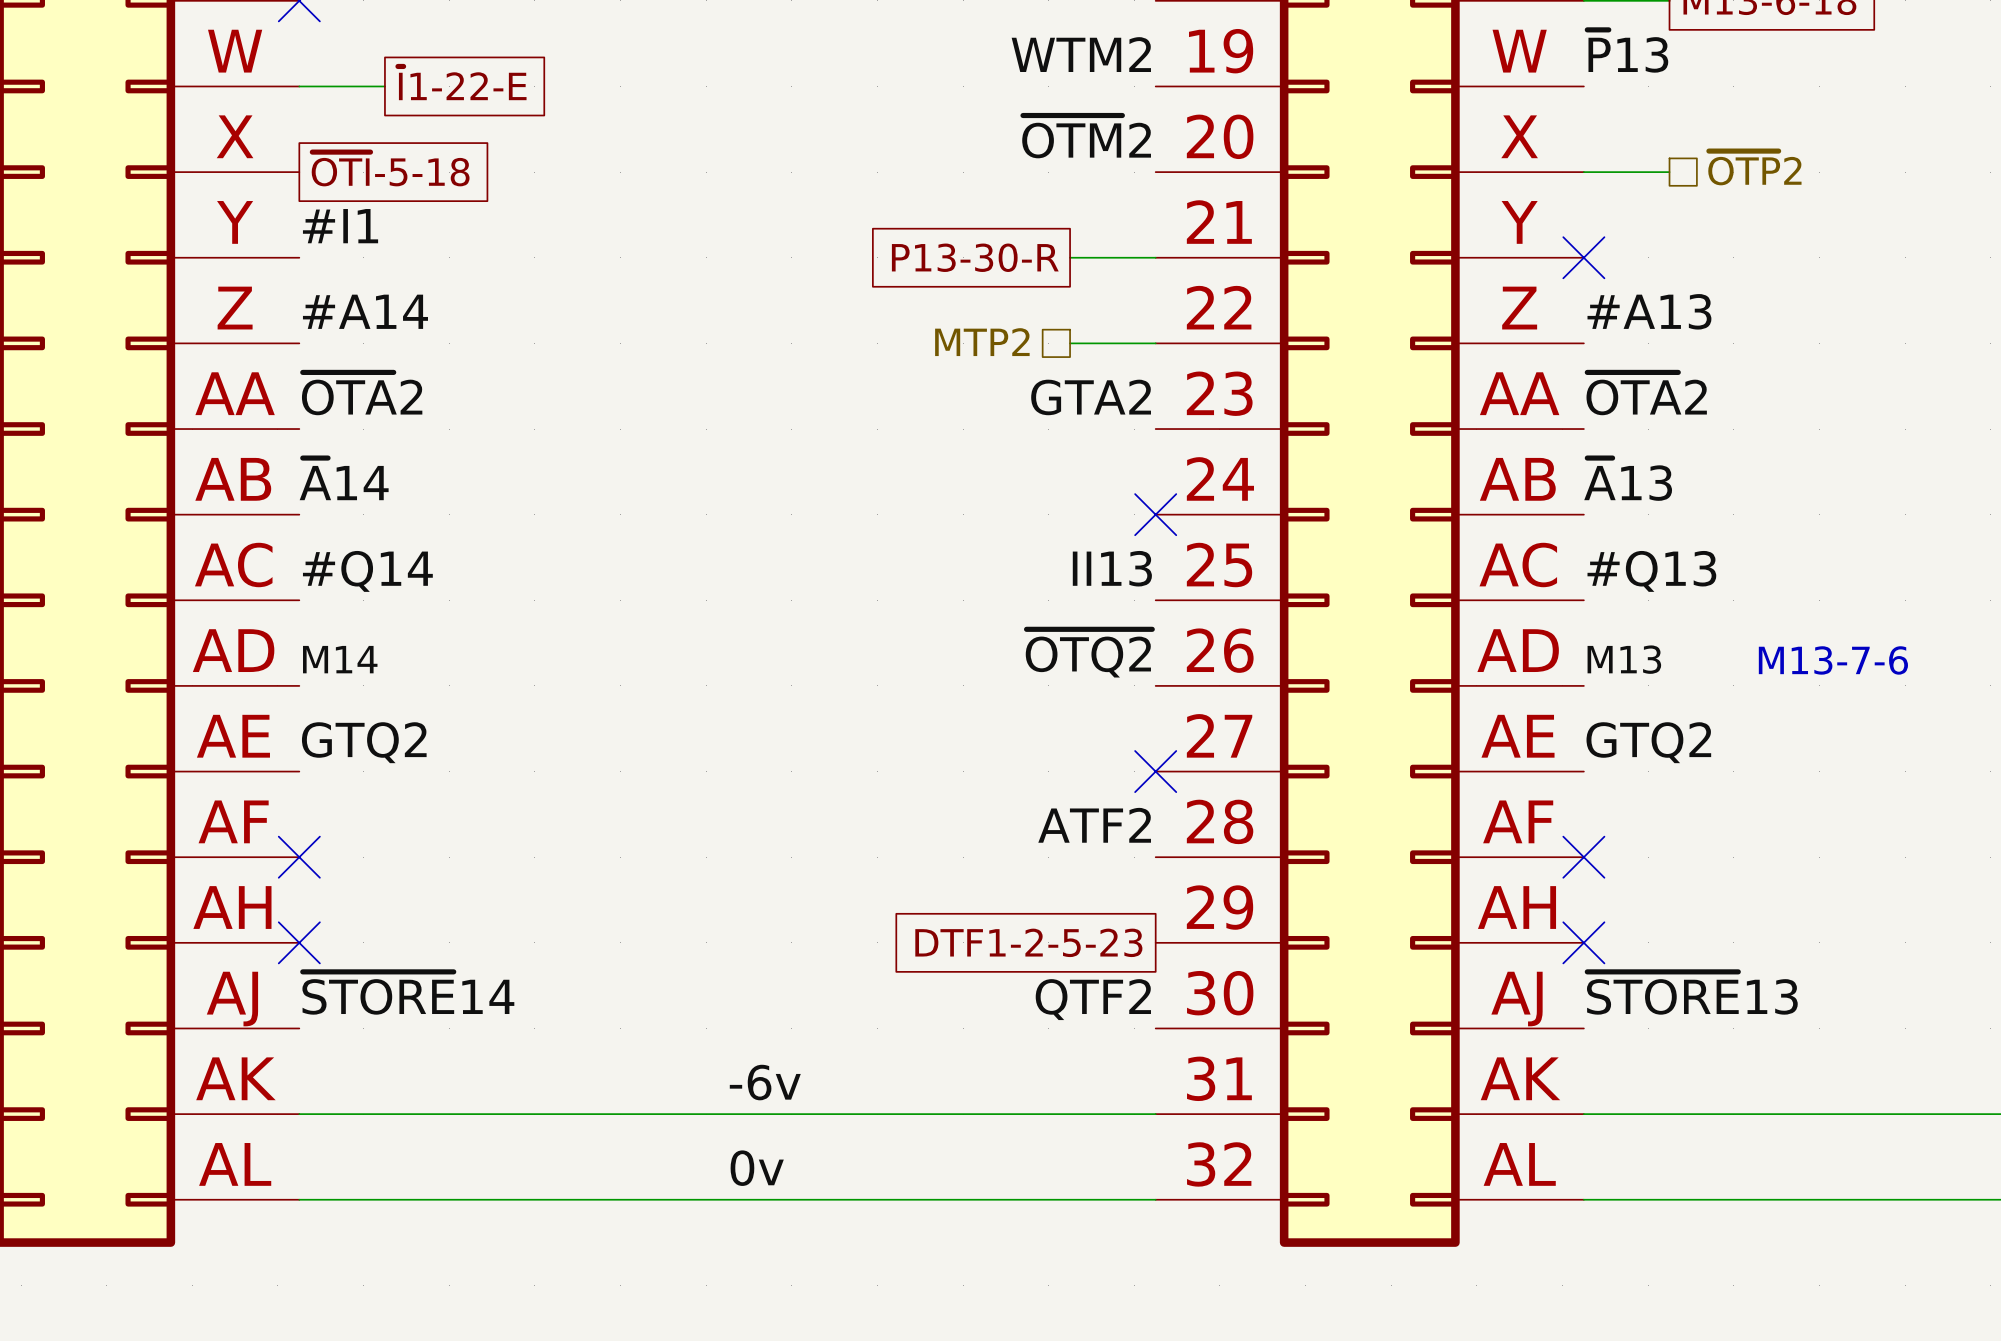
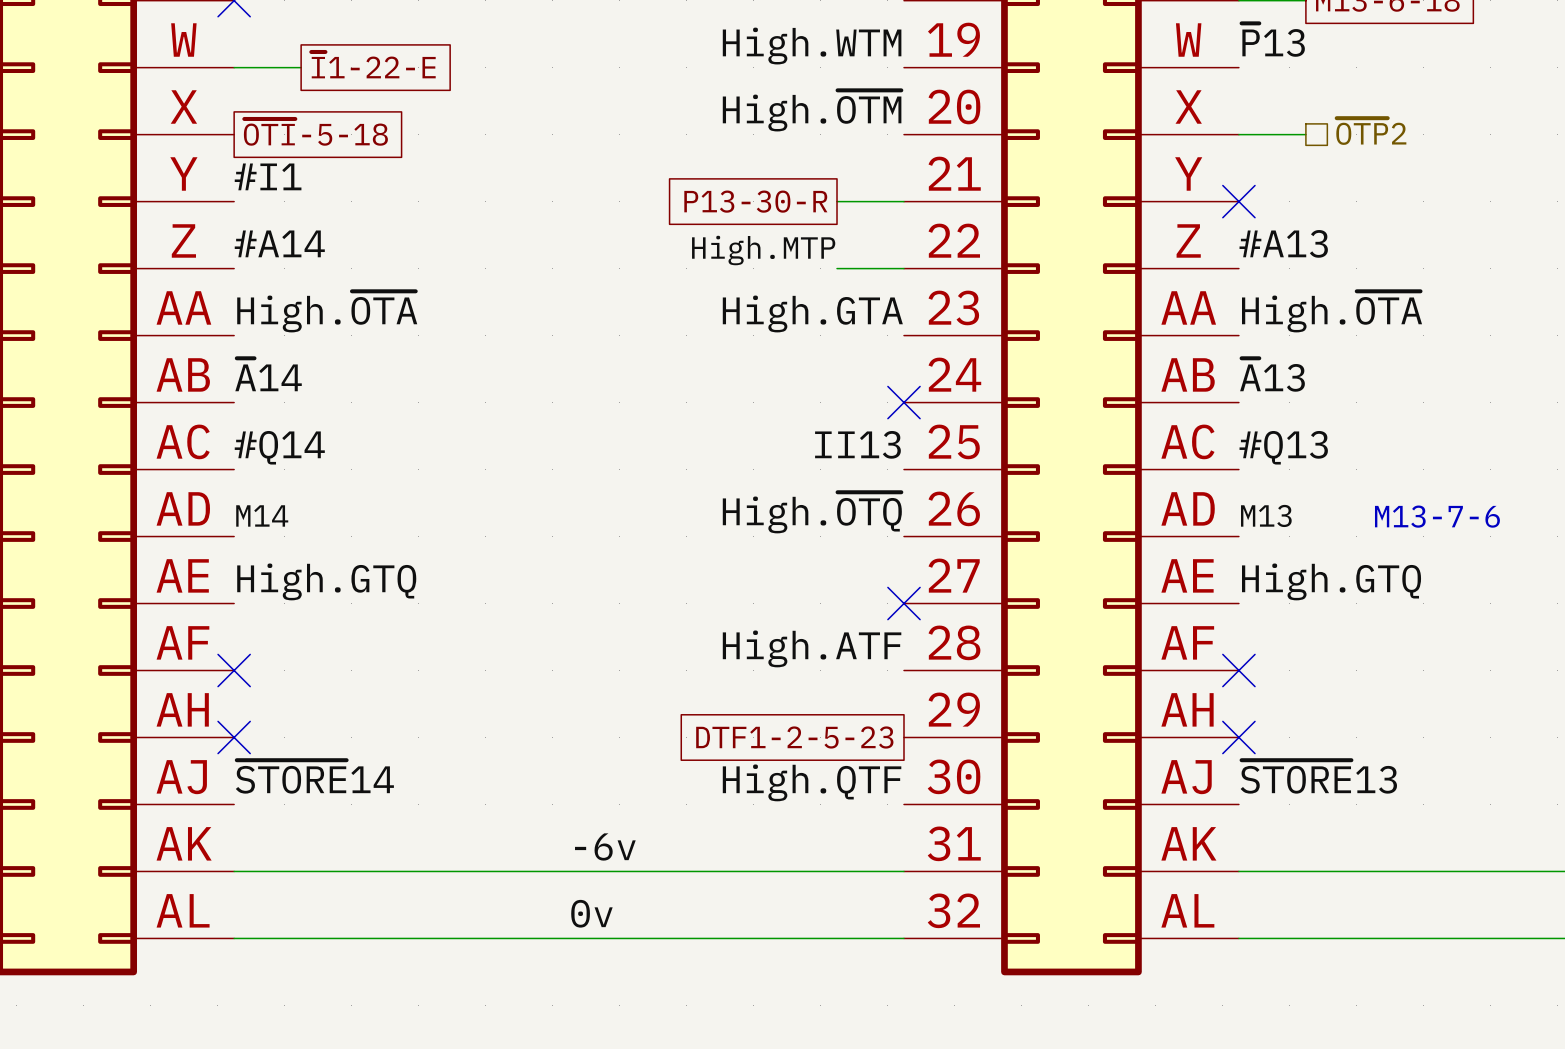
label: WTM2 (1081, 54) -> High.WTM (812, 46)
label: ~{OTM}2 (1086, 136) -> High.~{OTM} (812, 110)
label: none -> High.MTP (763, 250)
hierarchical label: MTP2 (982, 342) -> none
label: ~{OTA}2 (362, 393) -> High.~{OTA} (327, 311)
label: ~{OTA}2 (1646, 393) -> High.~{OTA} (1332, 311)
label: GTA2 (1091, 397) -> High.GTA (812, 313)
label: ~{OTQ2} (1089, 653) -> High.~{OTQ} (812, 512)
label: GTQ2 (364, 742) -> High.GTQ (326, 581)
label: GTQ2 (1648, 742) -> High.GTQ (1331, 581)
label: ATF2 (1094, 825) -> High.ATF (812, 648)
label: QTF2 (1093, 999) -> High.QTF (812, 782)

